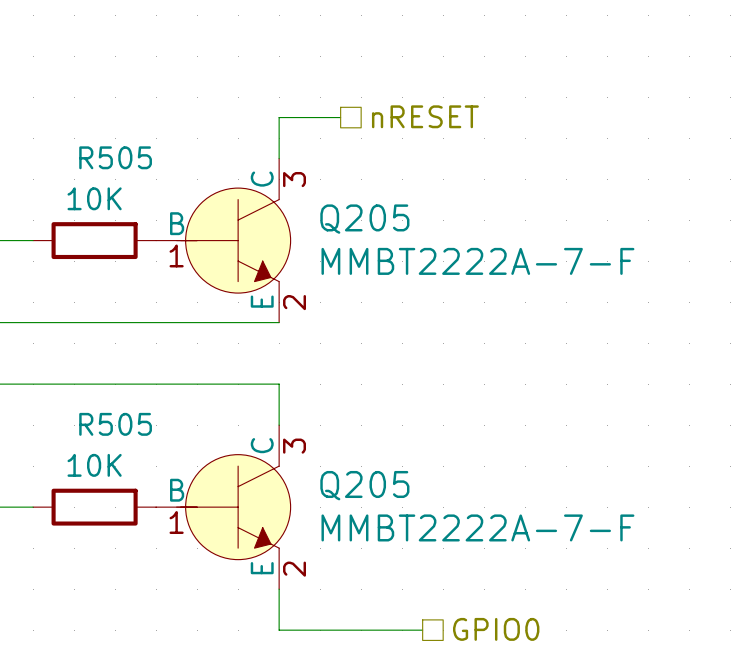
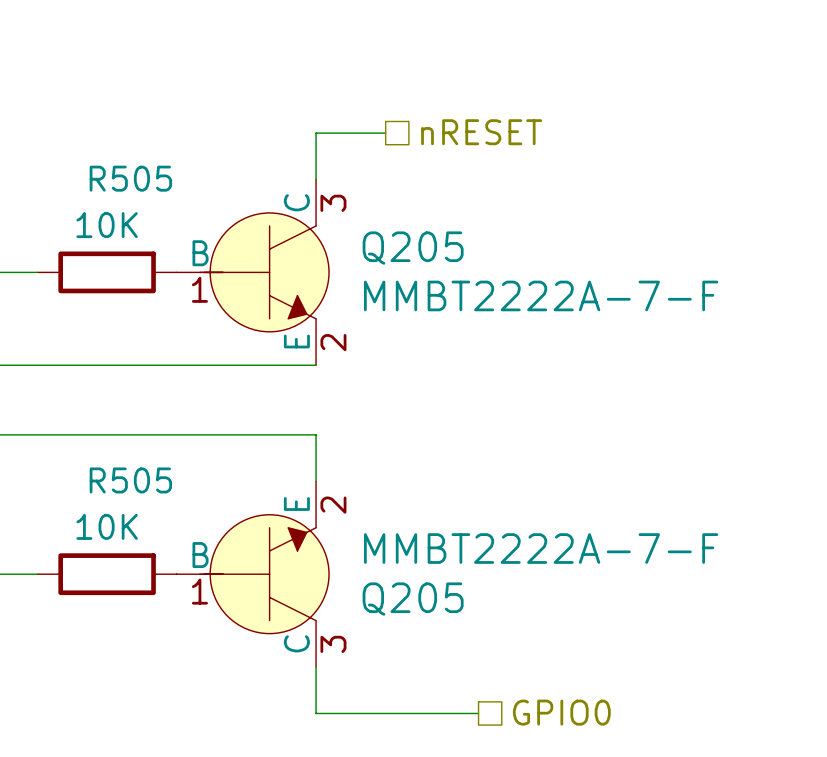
Q205 flip: as is (233, 507) -> up-down (264, 574)

